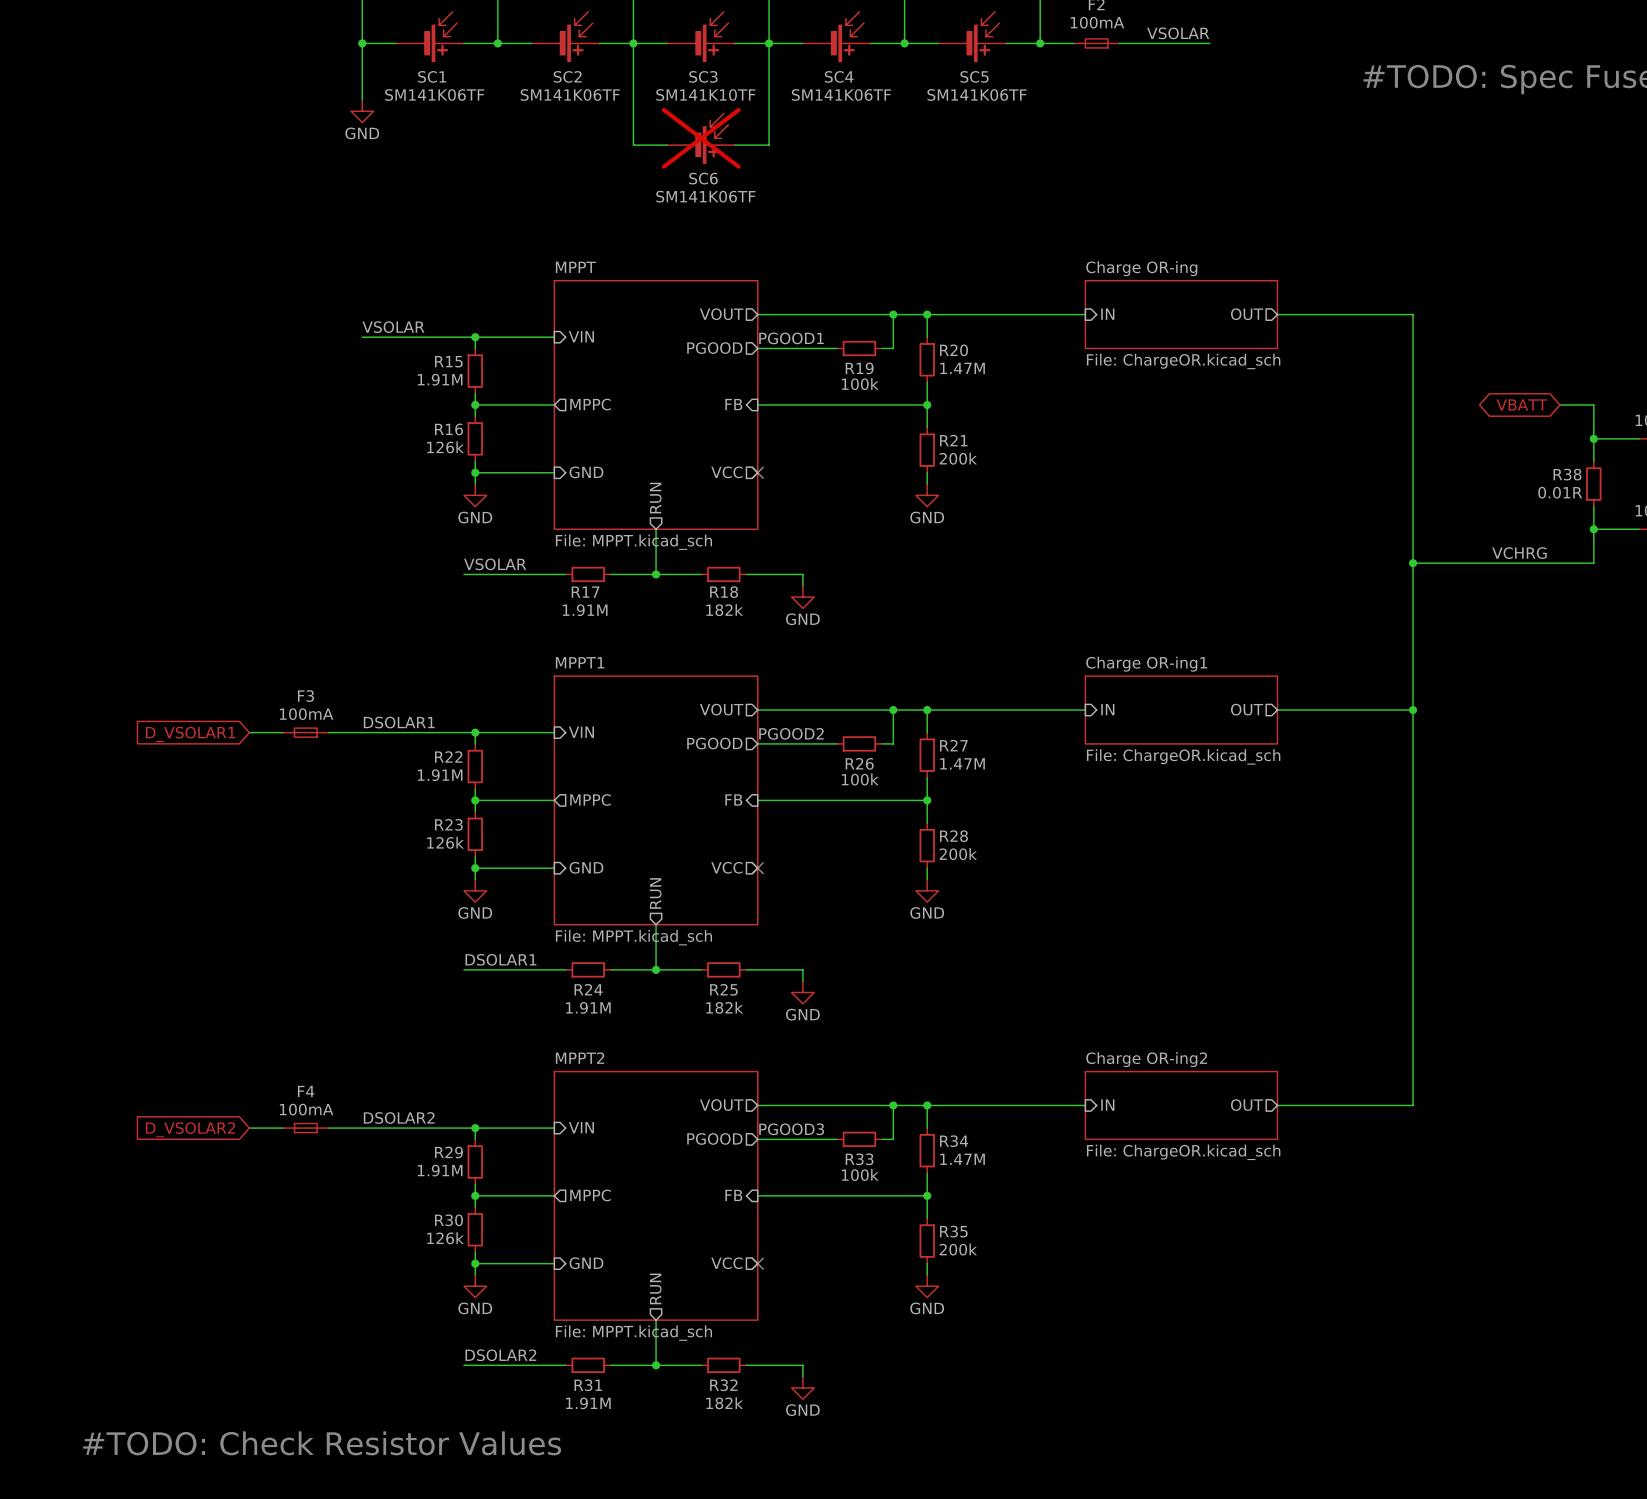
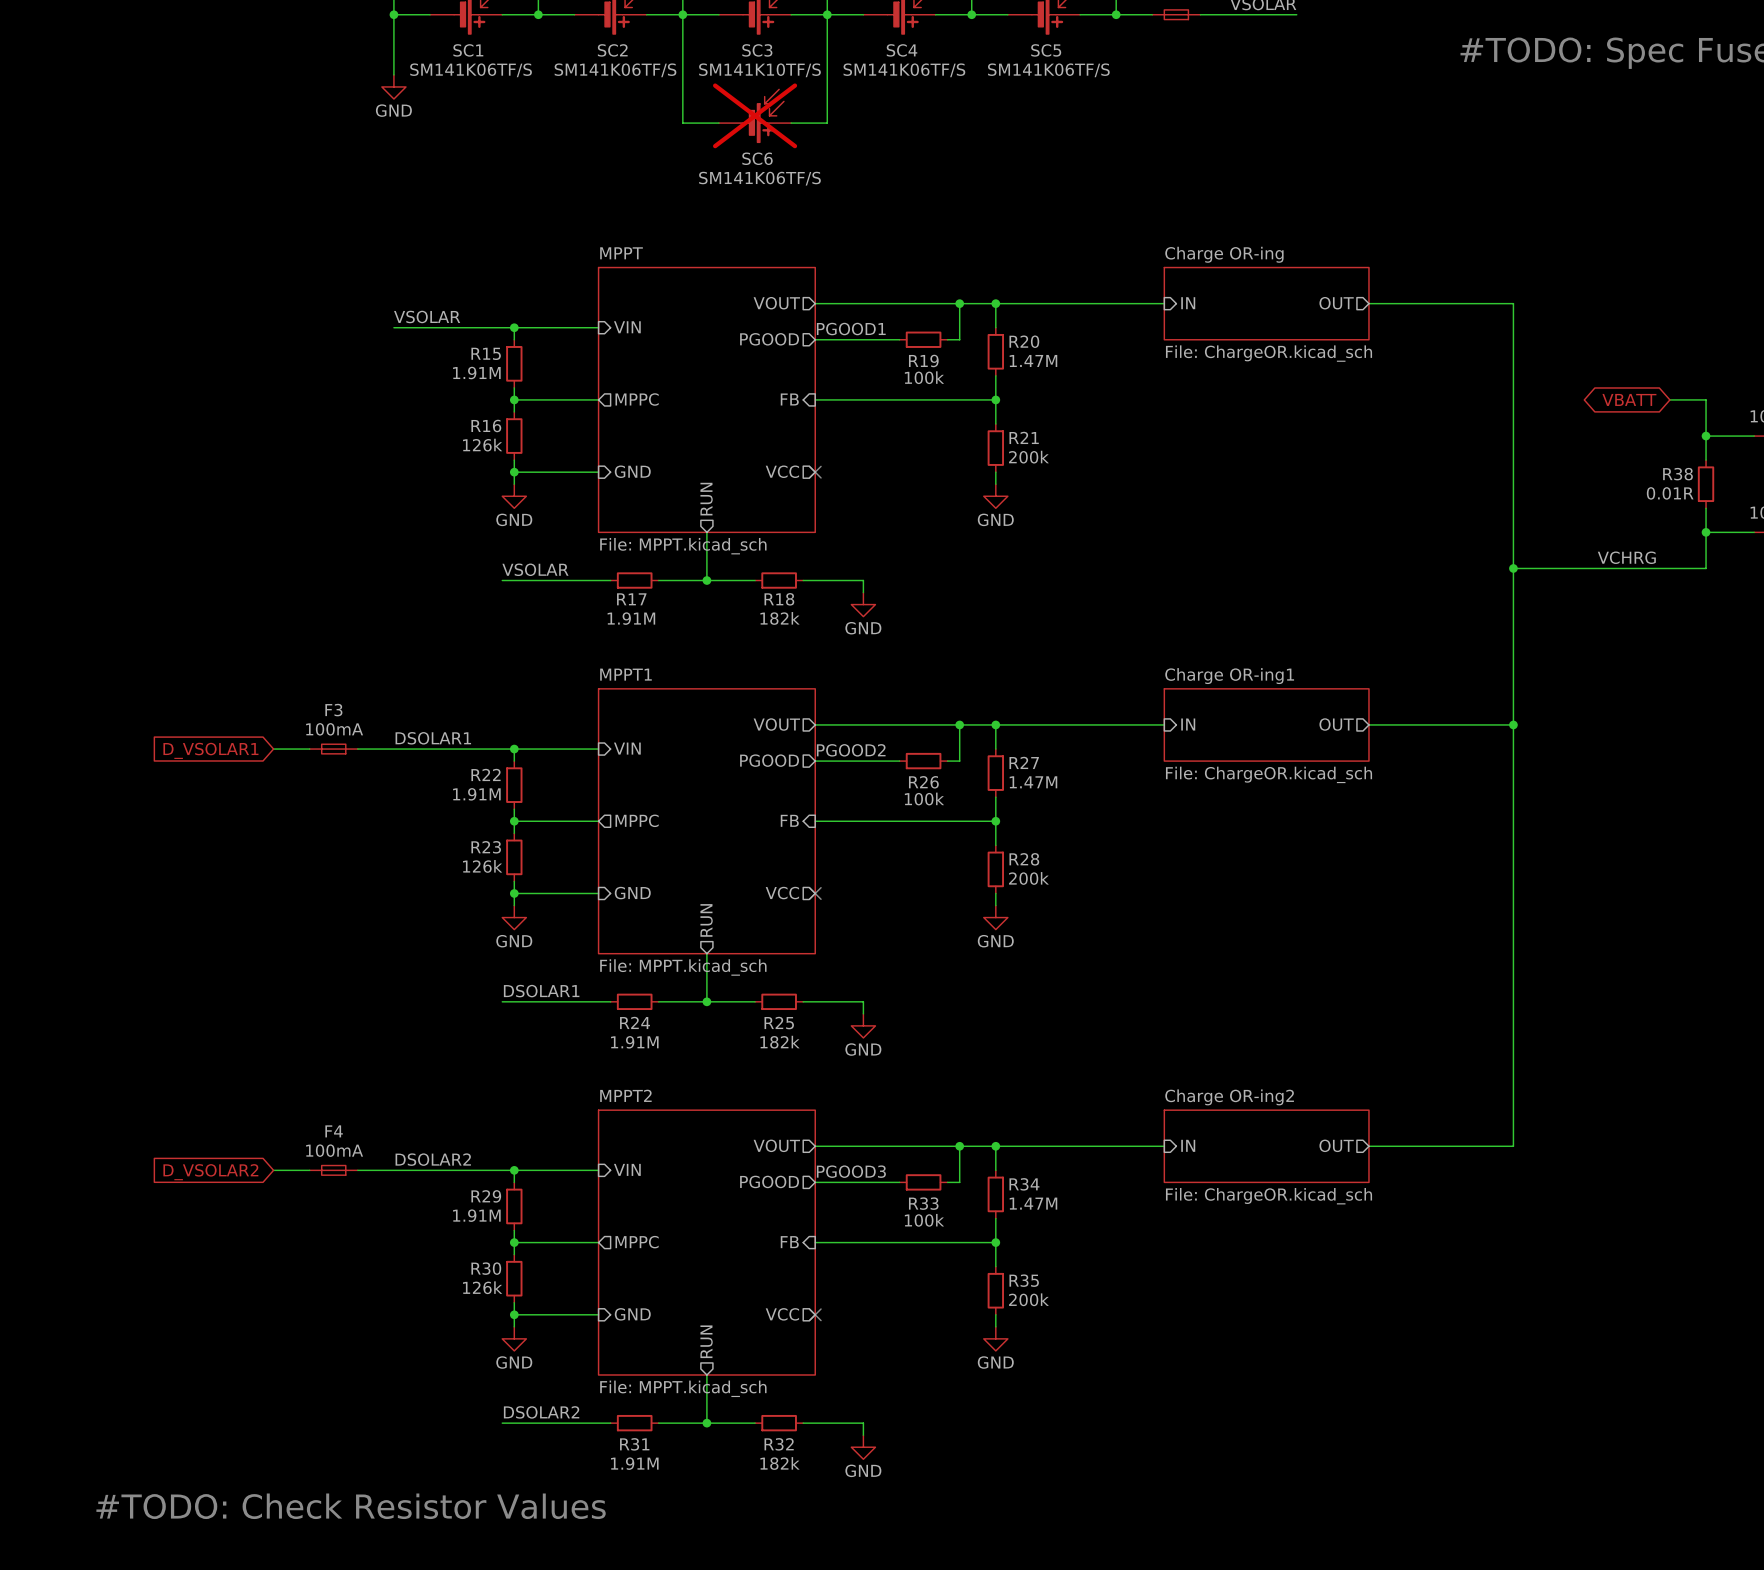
SC1 value: SM141K06TF (434, 94) -> SM141K06TF/S (471, 70)
SC2 value: SM141K06TF (570, 94) -> SM141K06TF/S (615, 70)
SC3 value: SM141K10TF (705, 94) -> SM141K10TF/S (759, 70)
SC4 value: SM141K06TF (841, 94) -> SM141K06TF/S (904, 70)
SC5 value: SM141K06TF (976, 94) -> SM141K06TF/S (1048, 70)
SC6 value: SM141K06TF (705, 196) -> SM141K06TF/S (759, 178)

